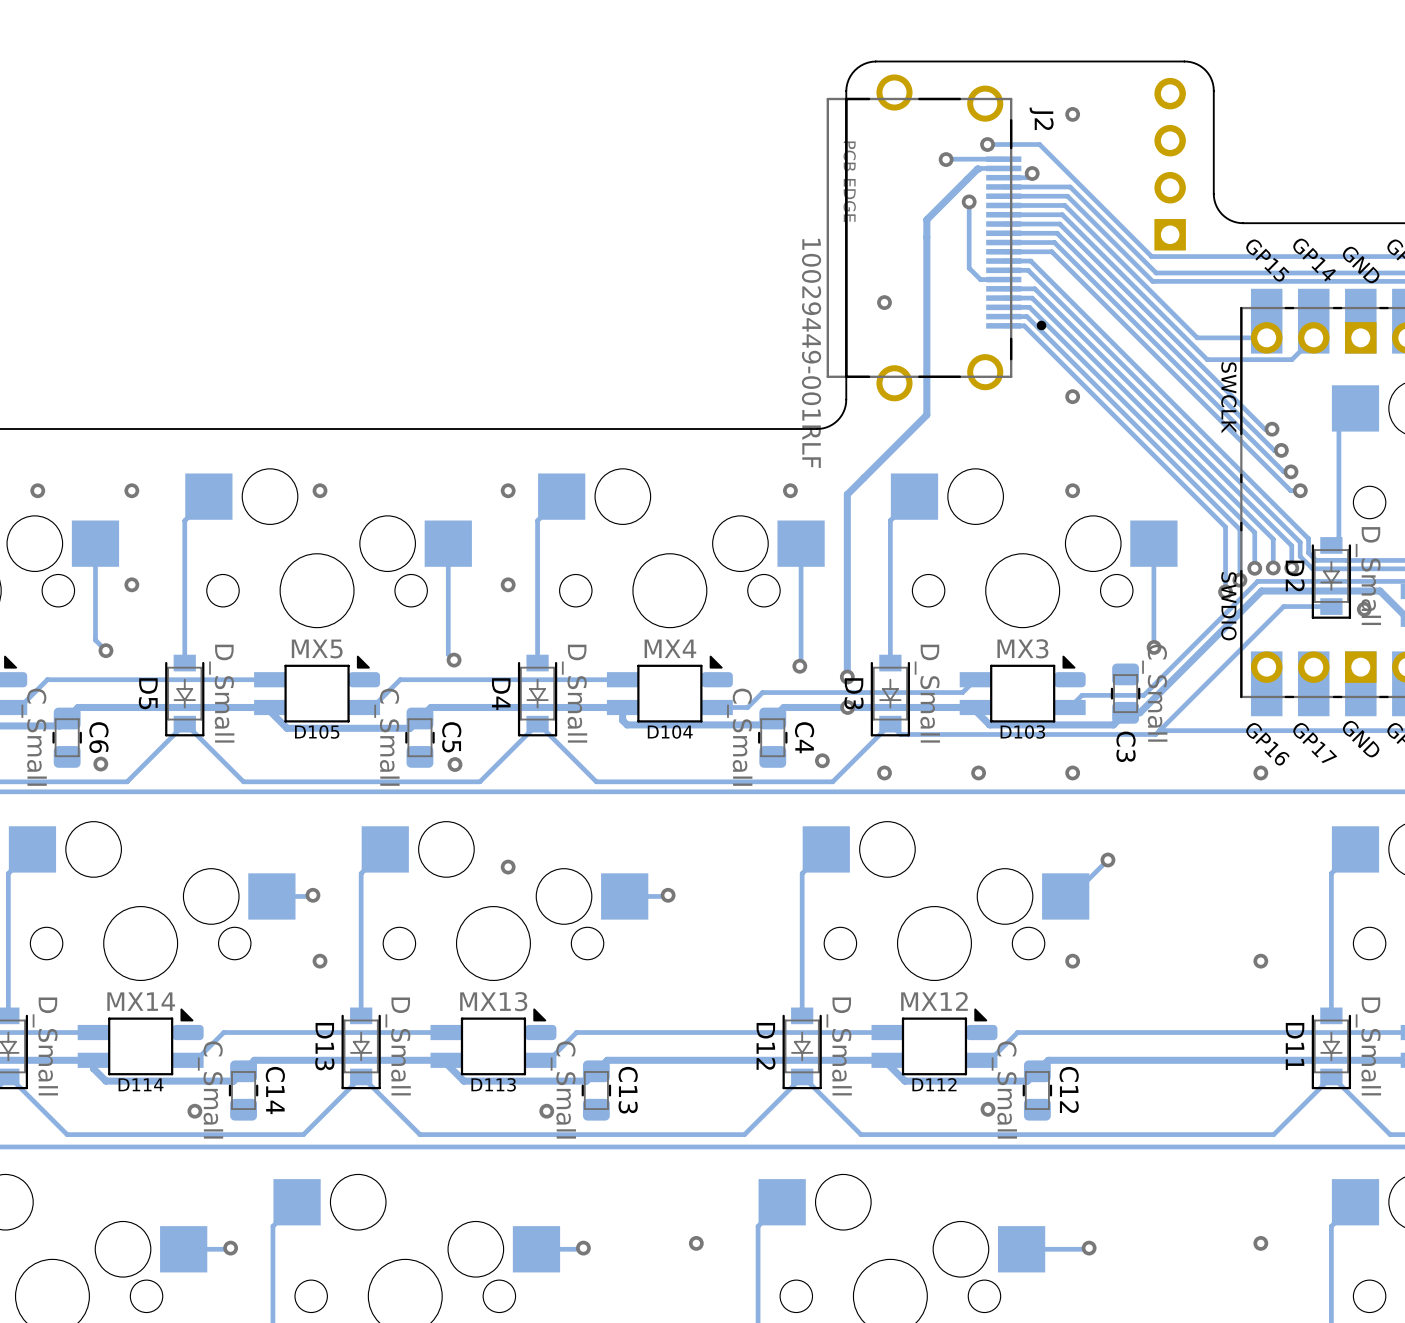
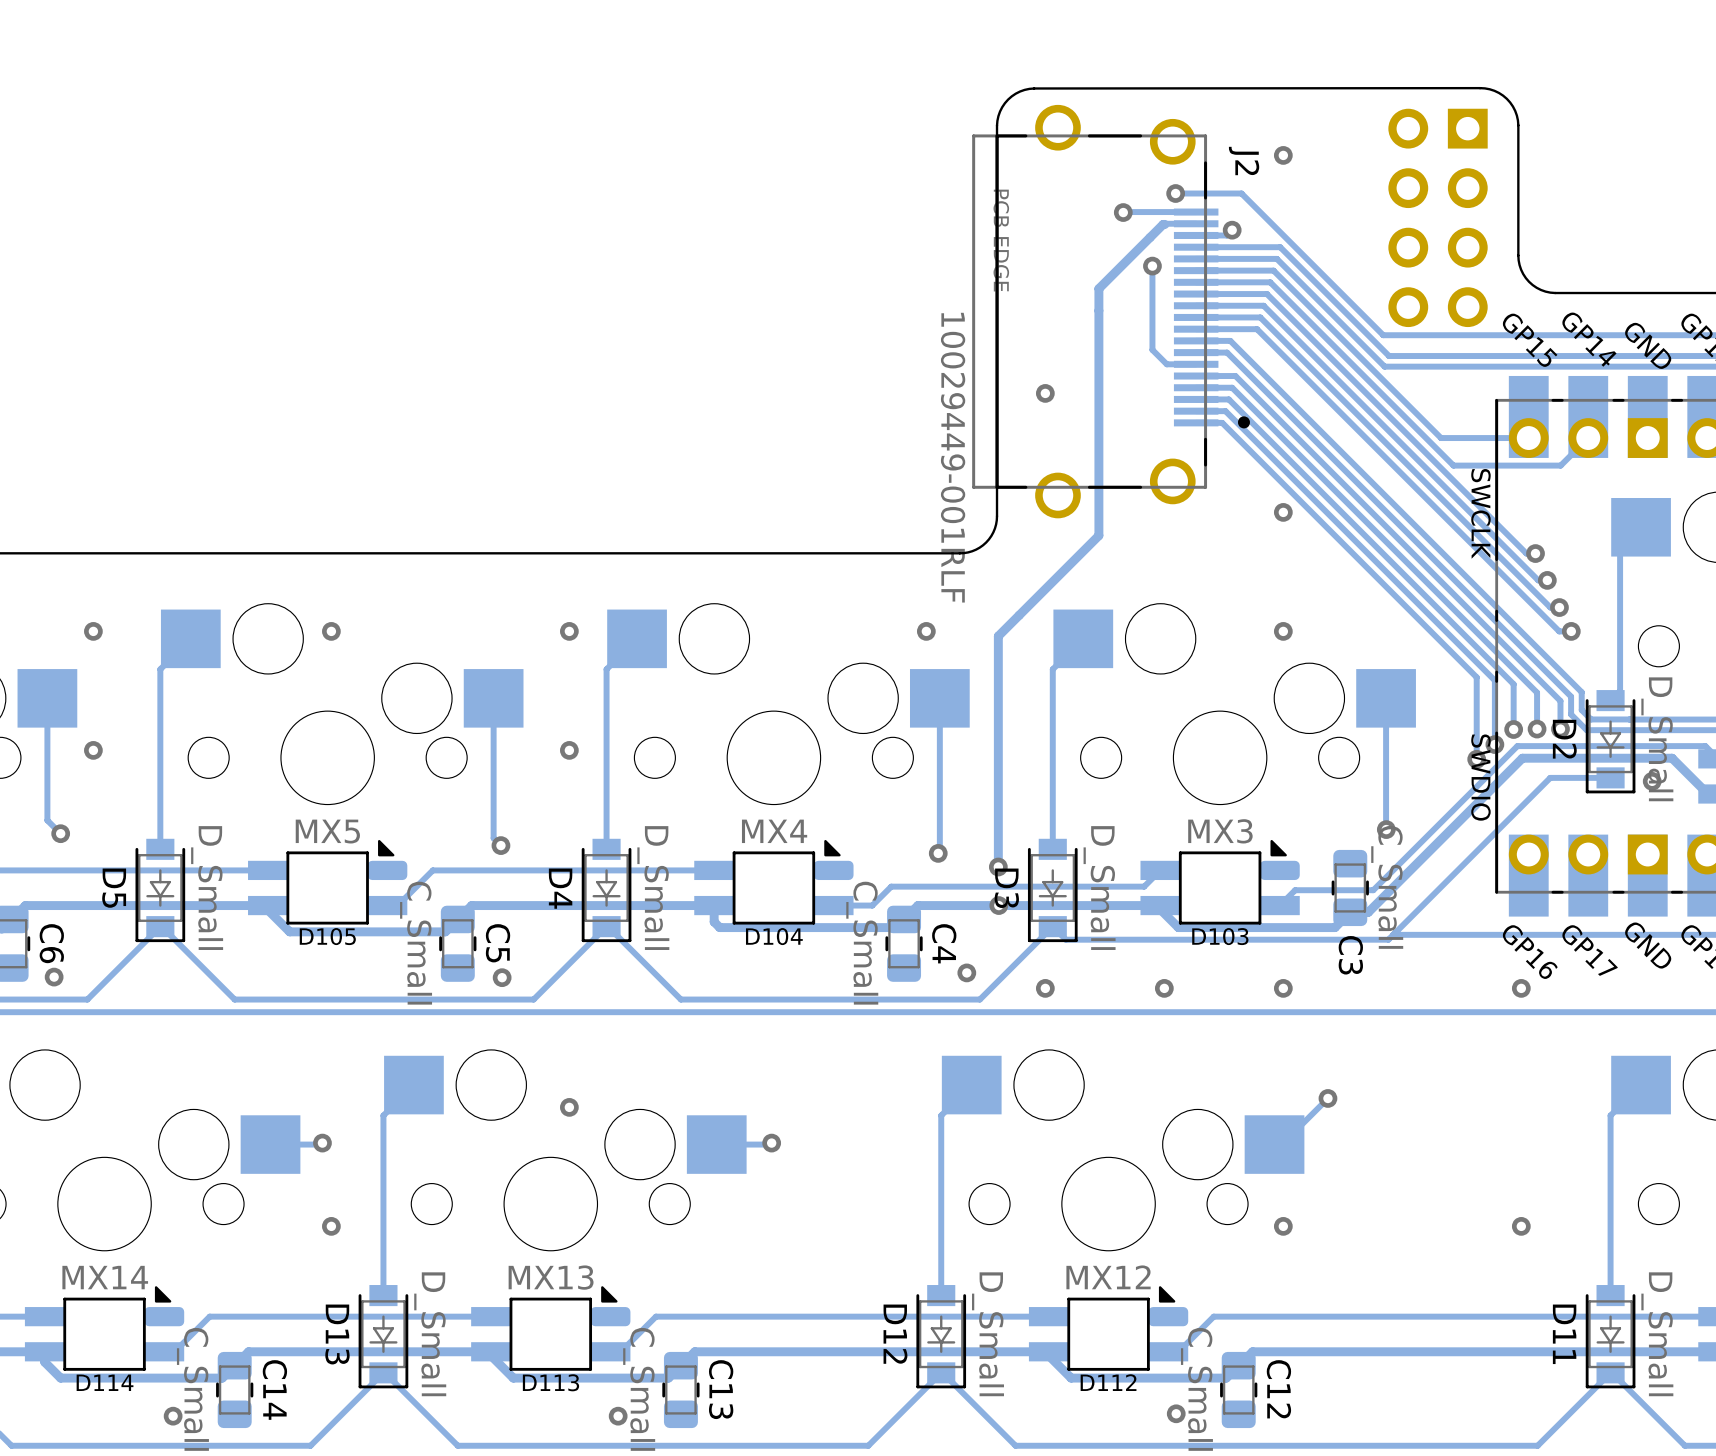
board edge: (875, 61) (1184, 61) (1194, 63) (1205, 70) (1213, 84) (1213, 193) (1218, 209) (1224, 216) (1236, 222) (1287, 223) -> (1034, 88) (1480, 88) (1494, 90) (1510, 102) (1517, 120) (1519, 265) (1523, 274) (1532, 285) (1541, 289) (1555, 293)
part: none -> (1438, 217)
part: (1170, 164) -> none

